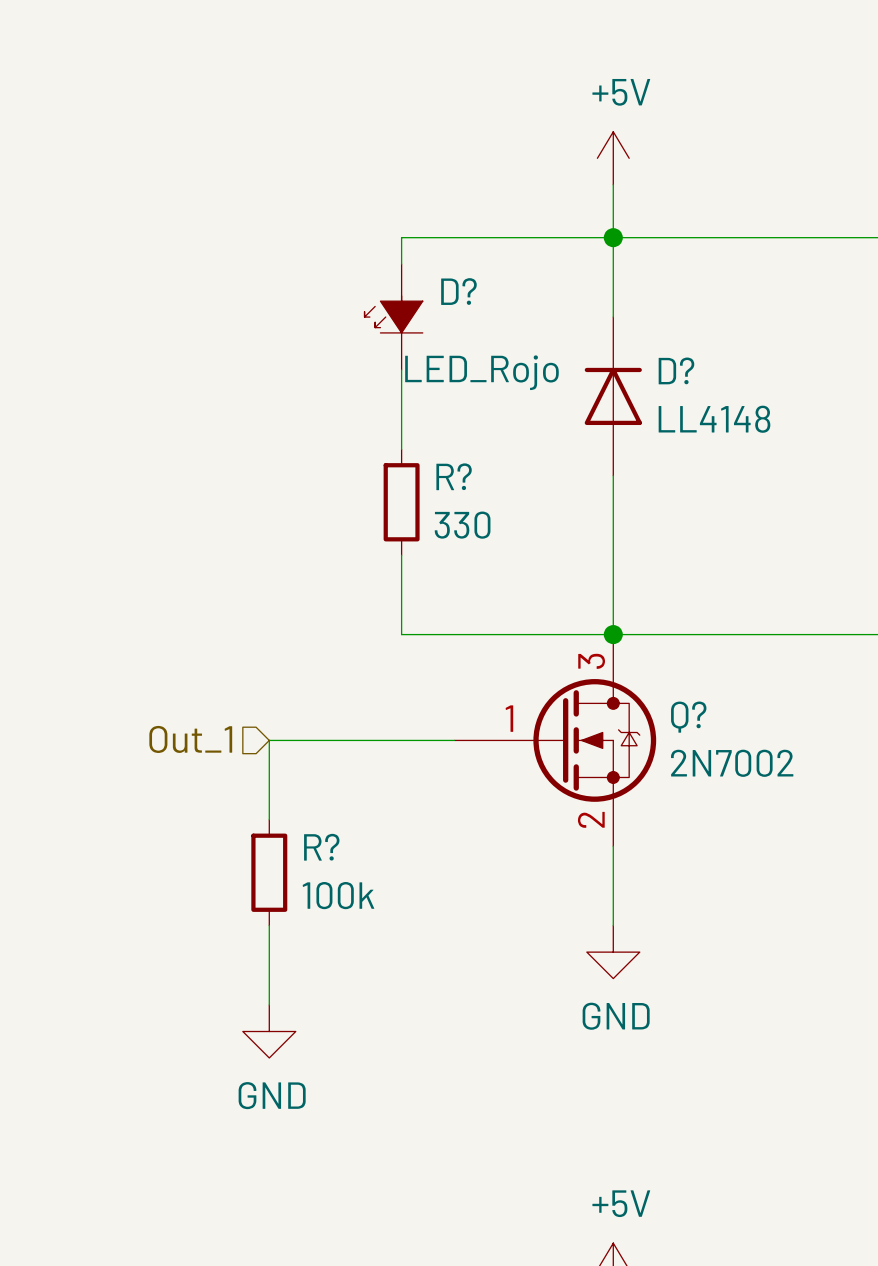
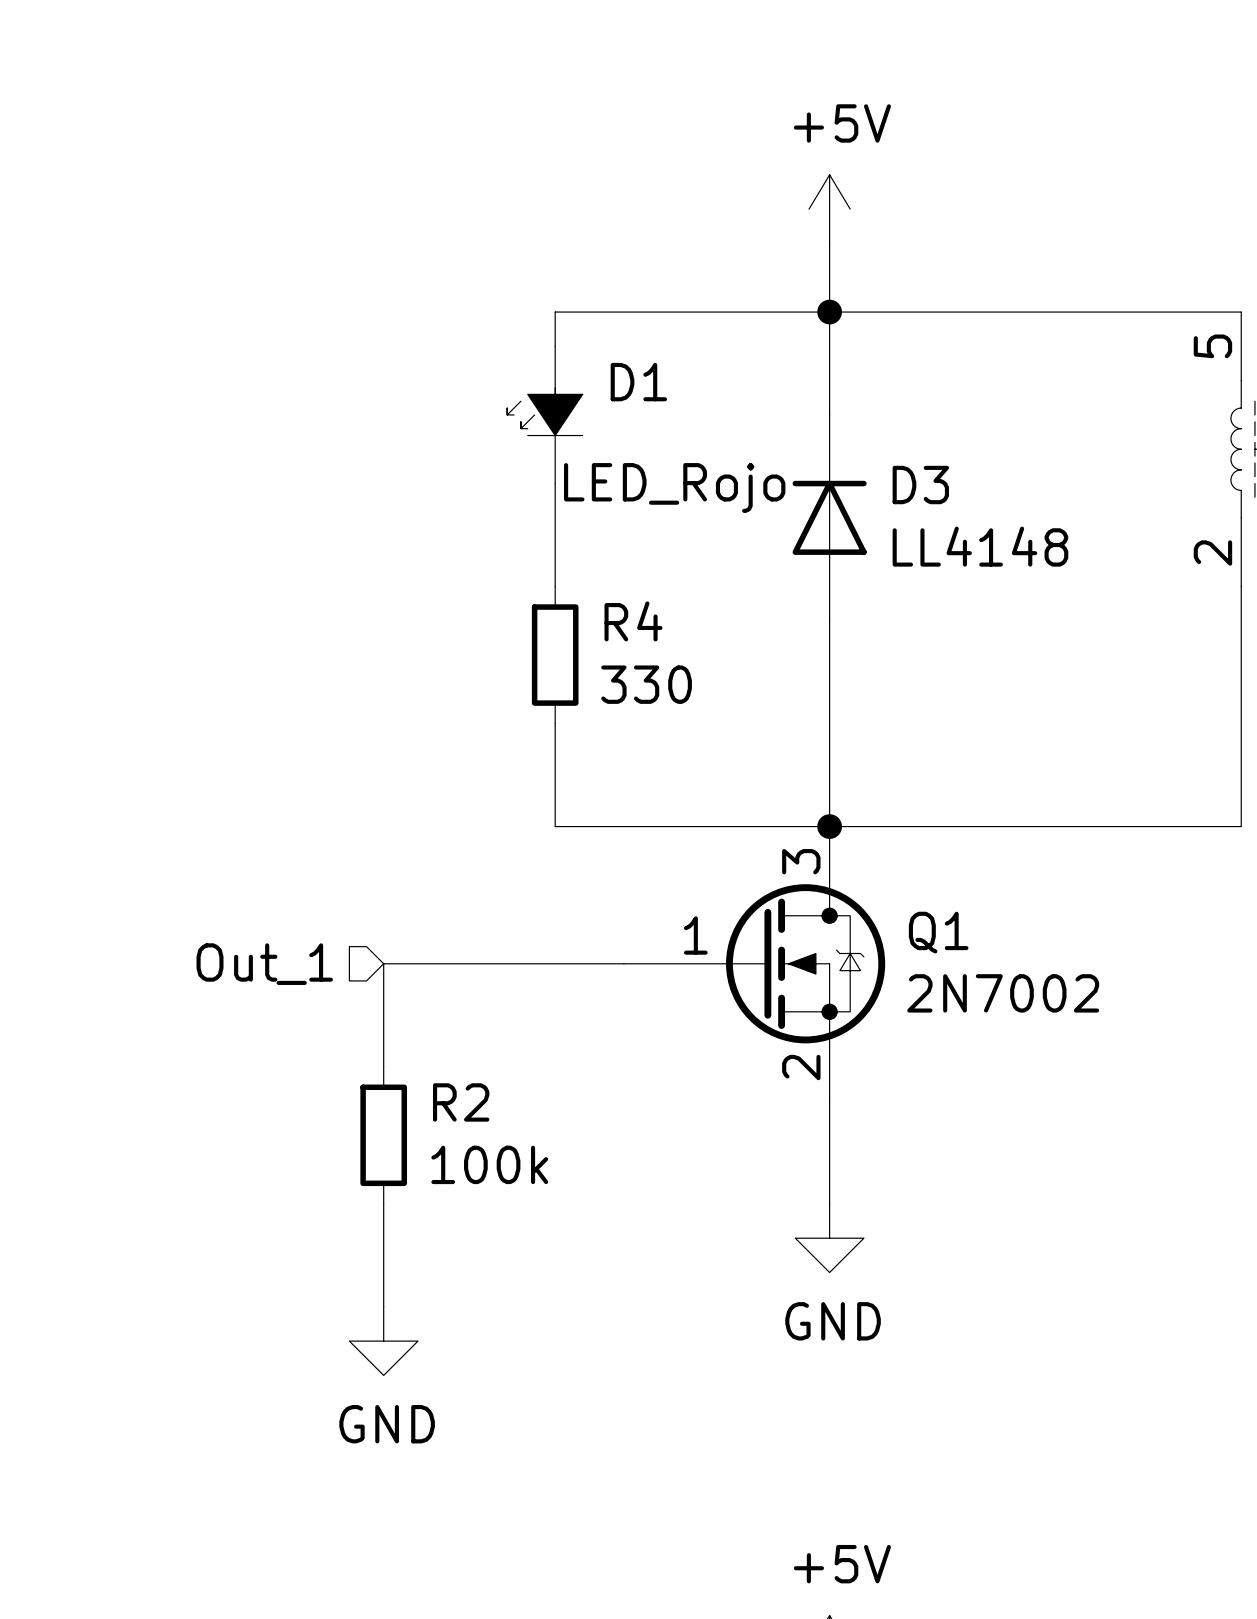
D? name: D? (458, 291) -> D1 (638, 382)
D? name: D? (676, 370) -> D3 (920, 485)
R? name: R? (454, 476) -> R4 (633, 621)
Q? name: Q? (688, 717) -> Q1 (938, 932)
R? name: R? (321, 847) -> R2 (461, 1102)

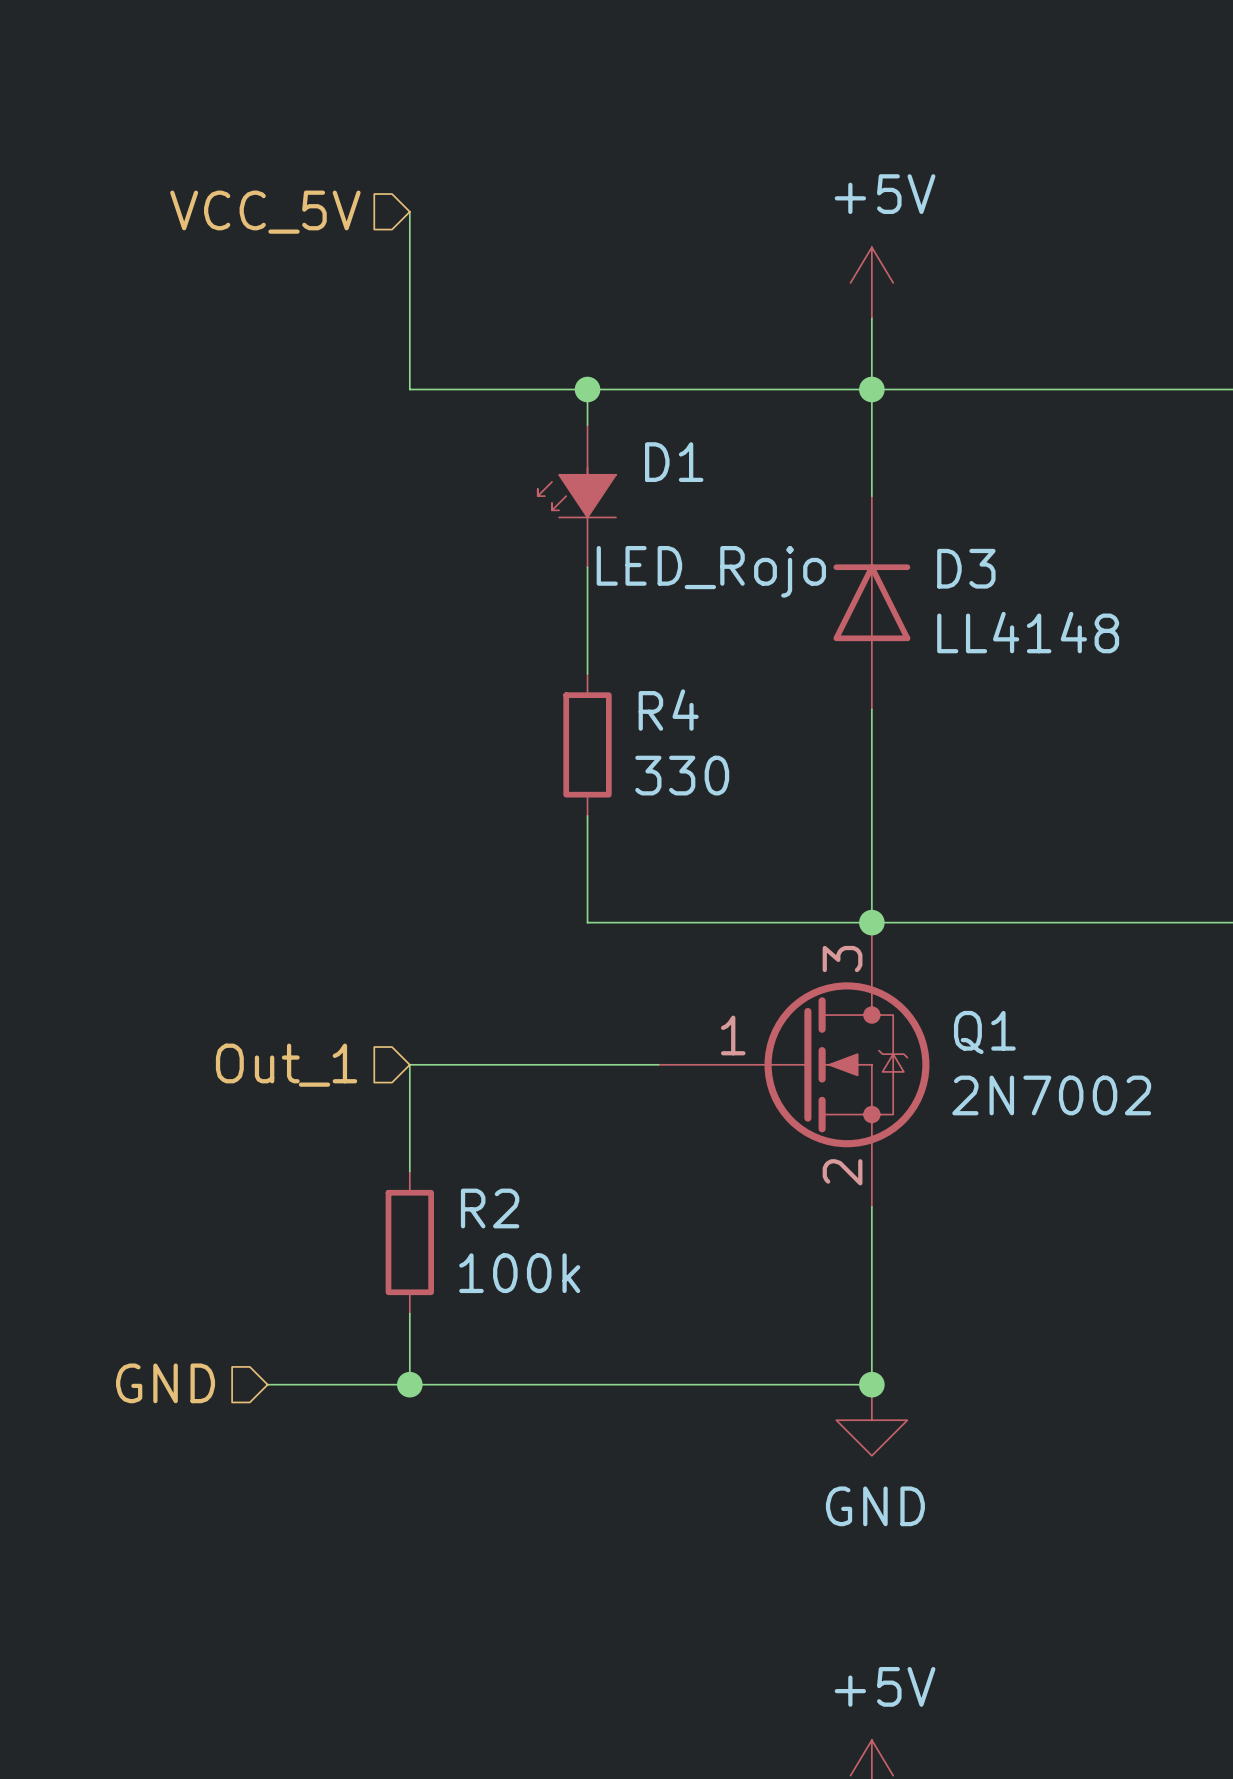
hierarchical label: none -> VCC_5V (265, 212)
wire: none -> (409, 211) (409, 389) (587, 389)
junction: none -> (587, 389)
wire: none -> (871, 1313) (871, 1384) (267, 1384)
power symbol position: GND (829, 1238) -> GND (871, 1420)
hierarchical label: none -> GND (165, 1383)
wire: (383, 1272) (383, 1306) -> none
junction: none -> (409, 1384)
junction: none -> (871, 1384)
power symbol: GND (383, 1341) -> none

